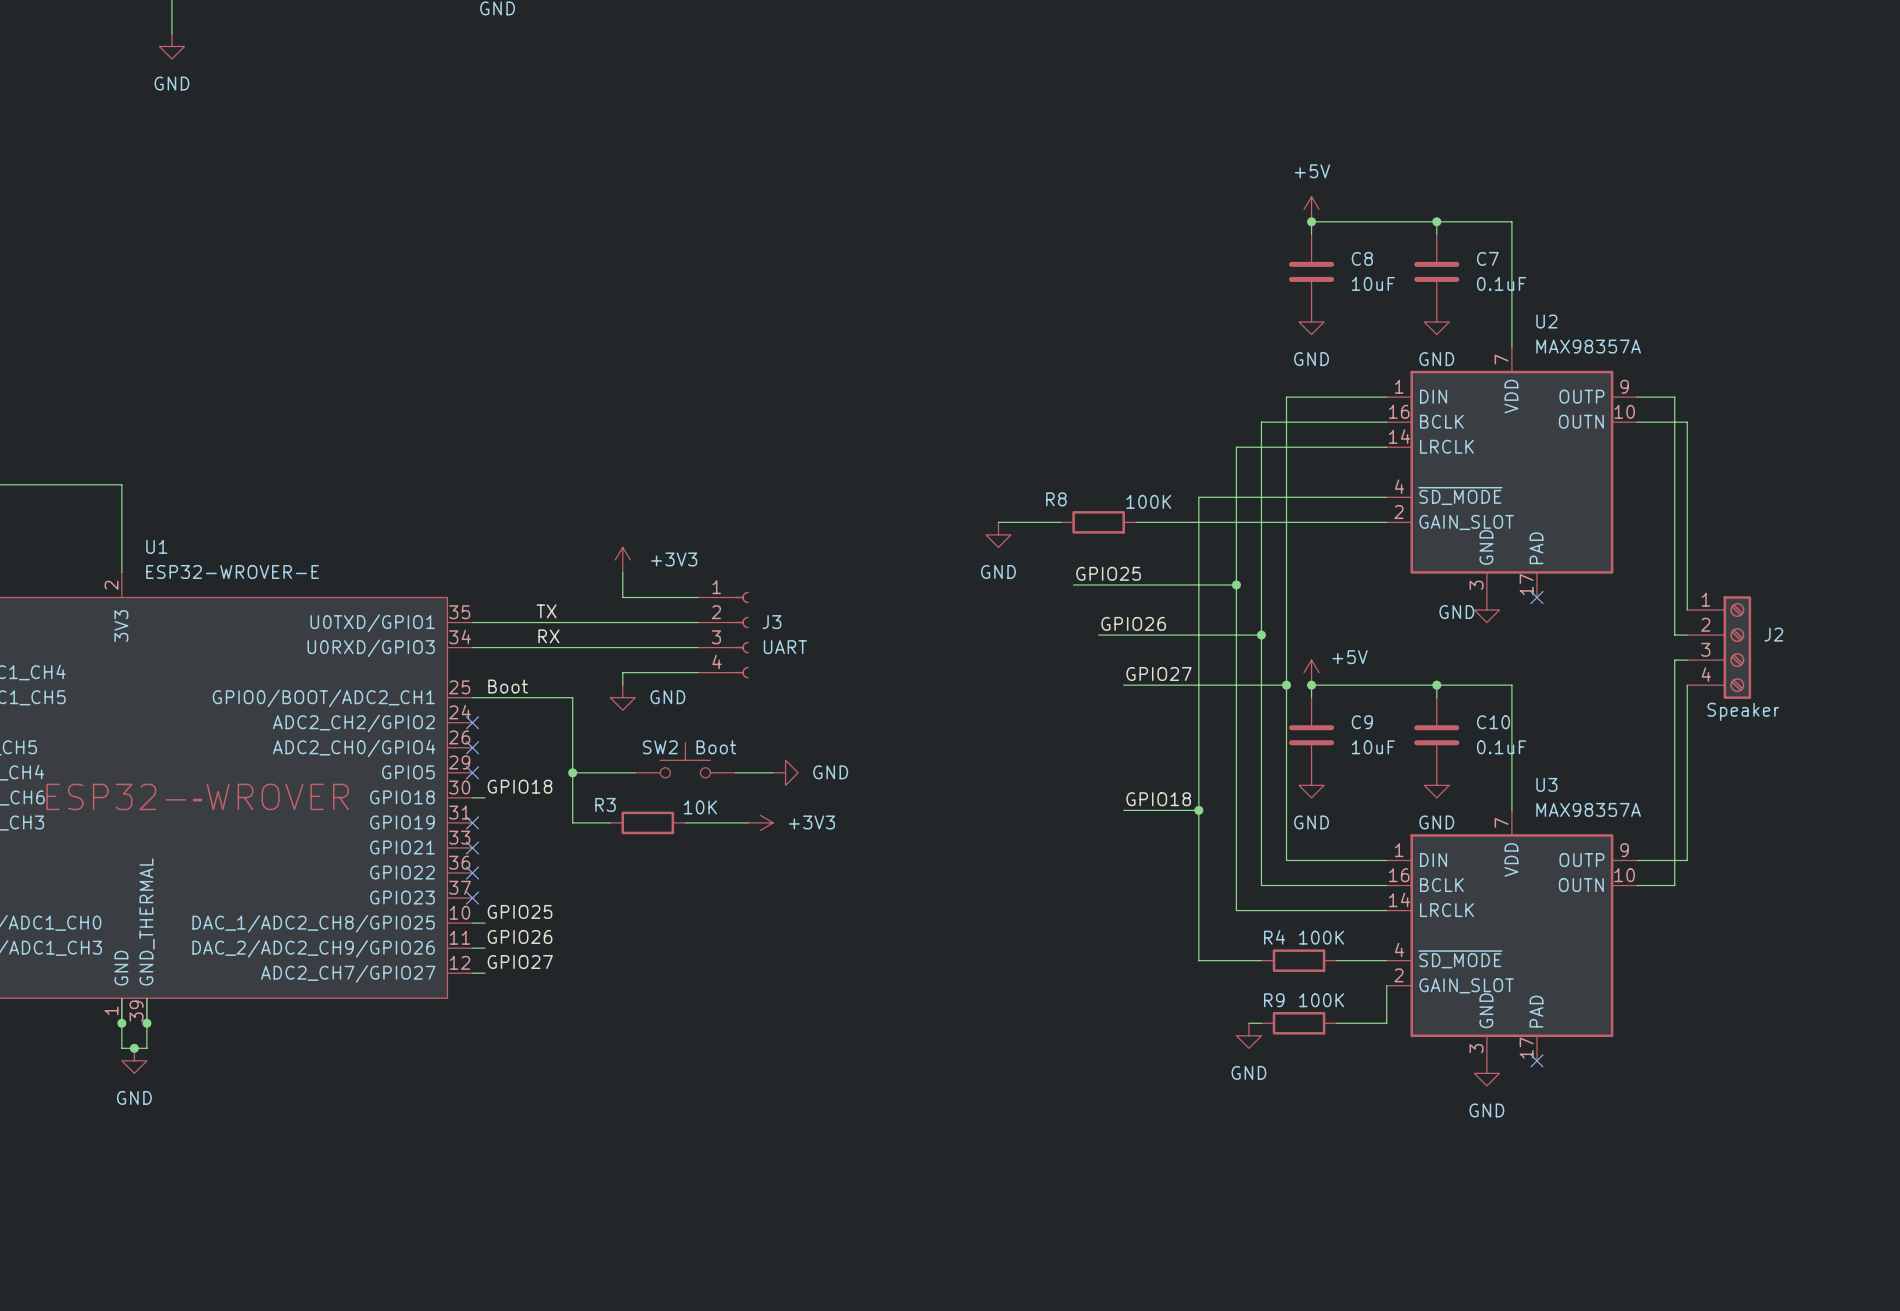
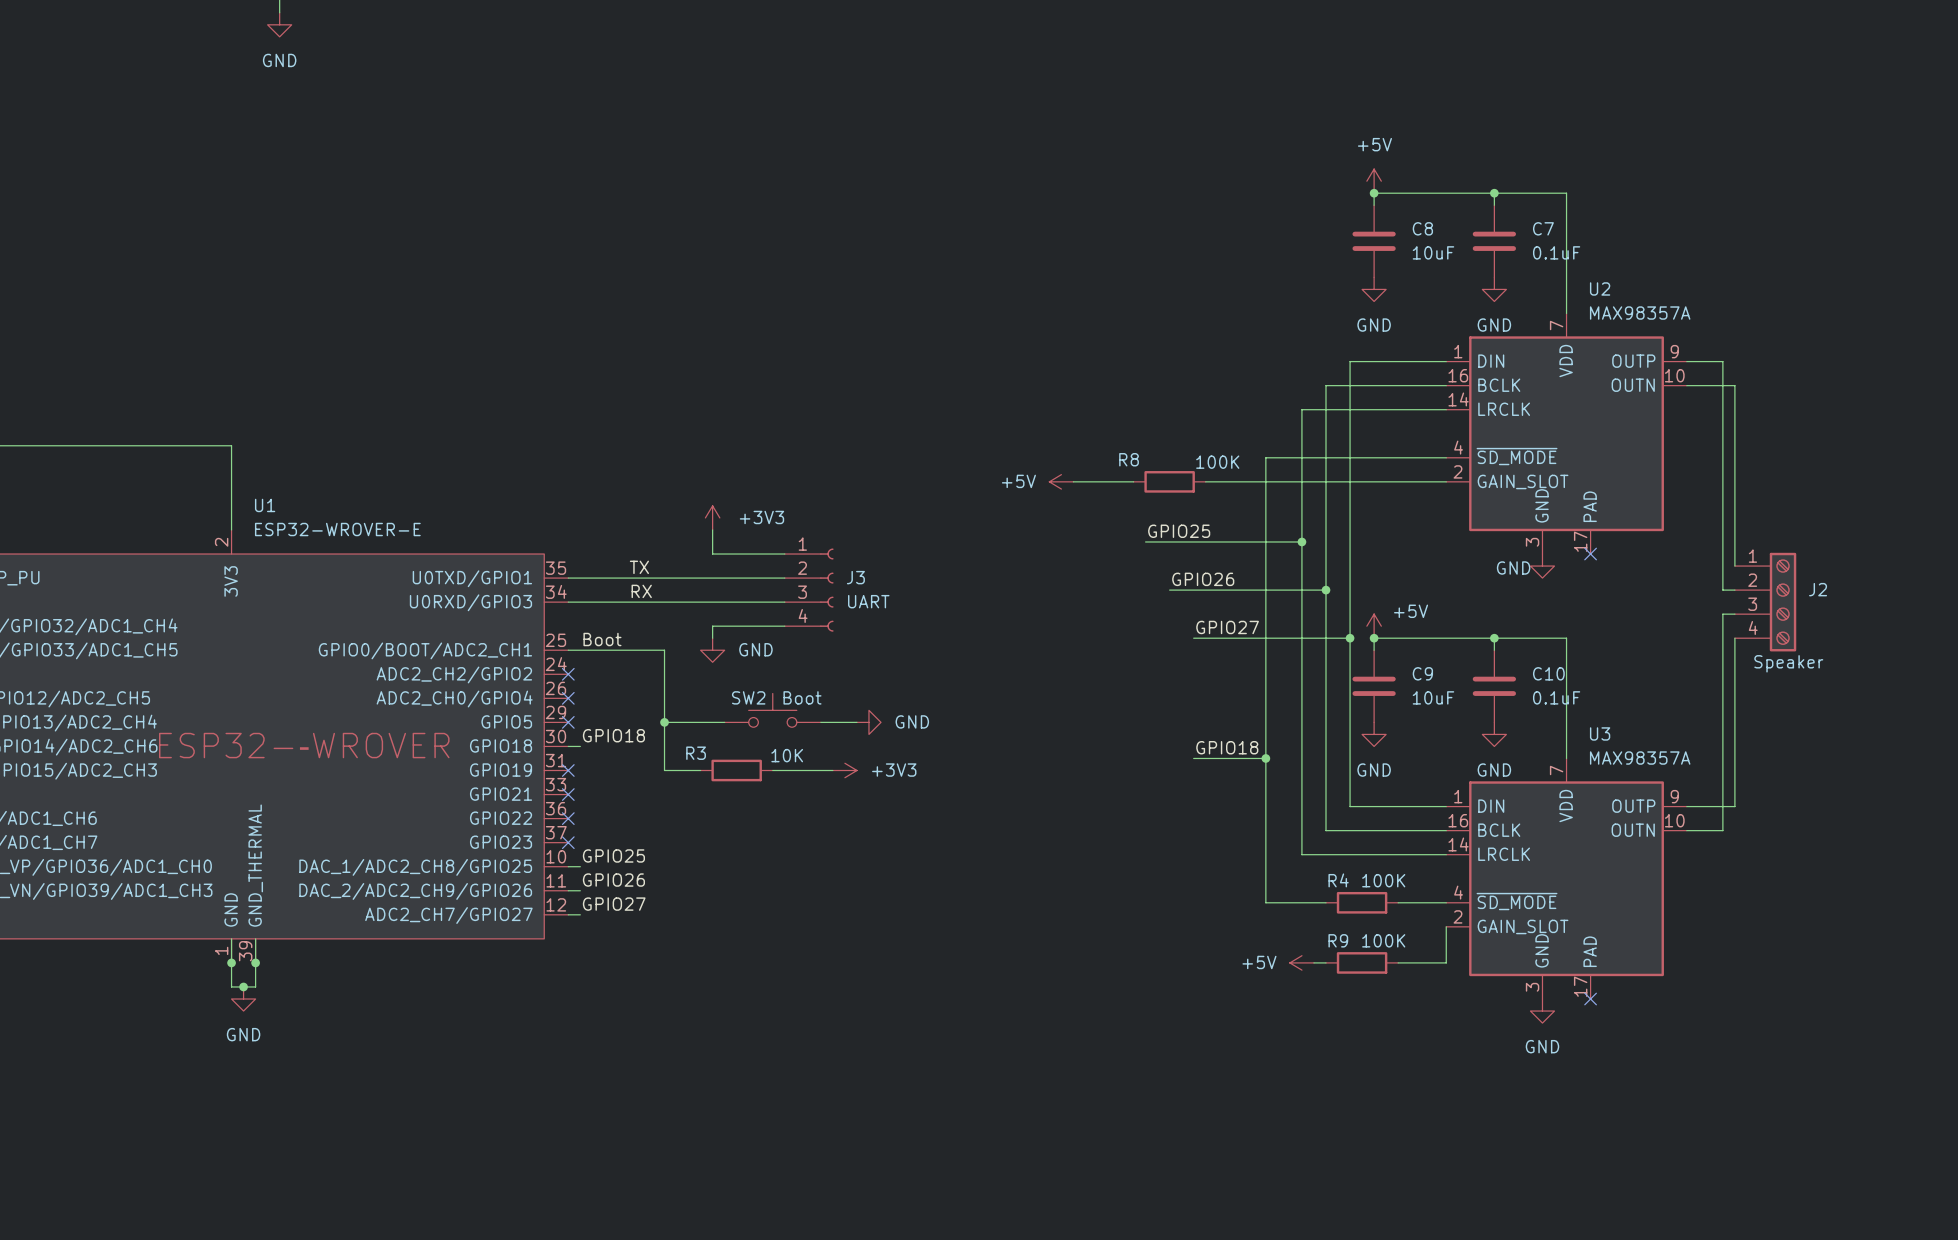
power symbol: none -> +5V (1061, 481)
power symbol: GND (998, 534) -> none
power symbol: none -> +5V (1301, 962)
power symbol: GND (1248, 1035) -> none

